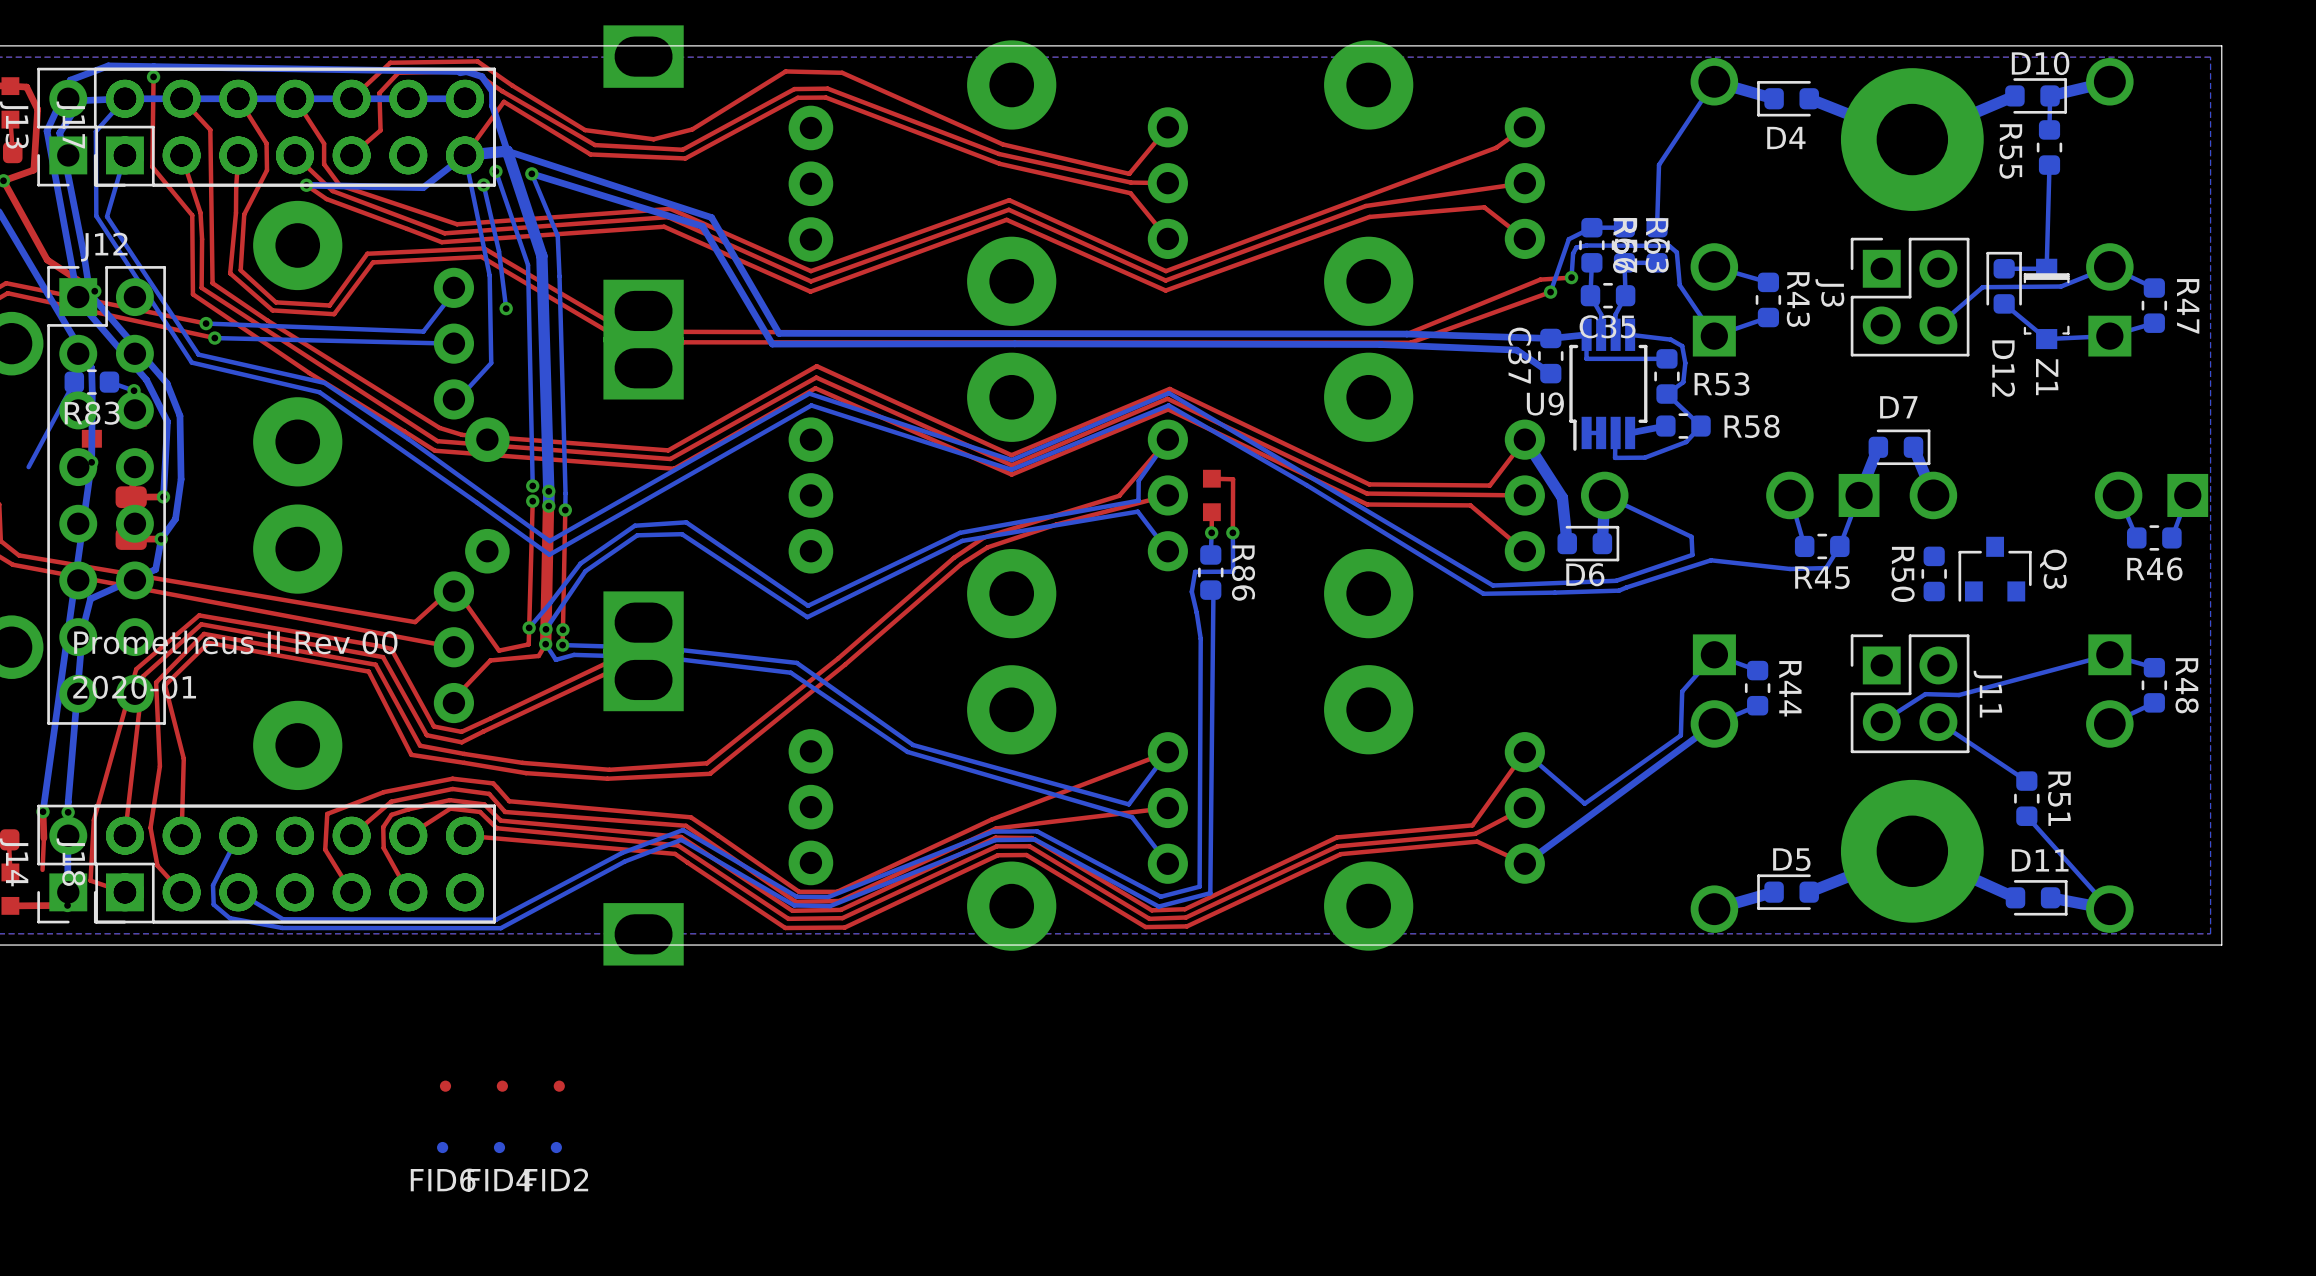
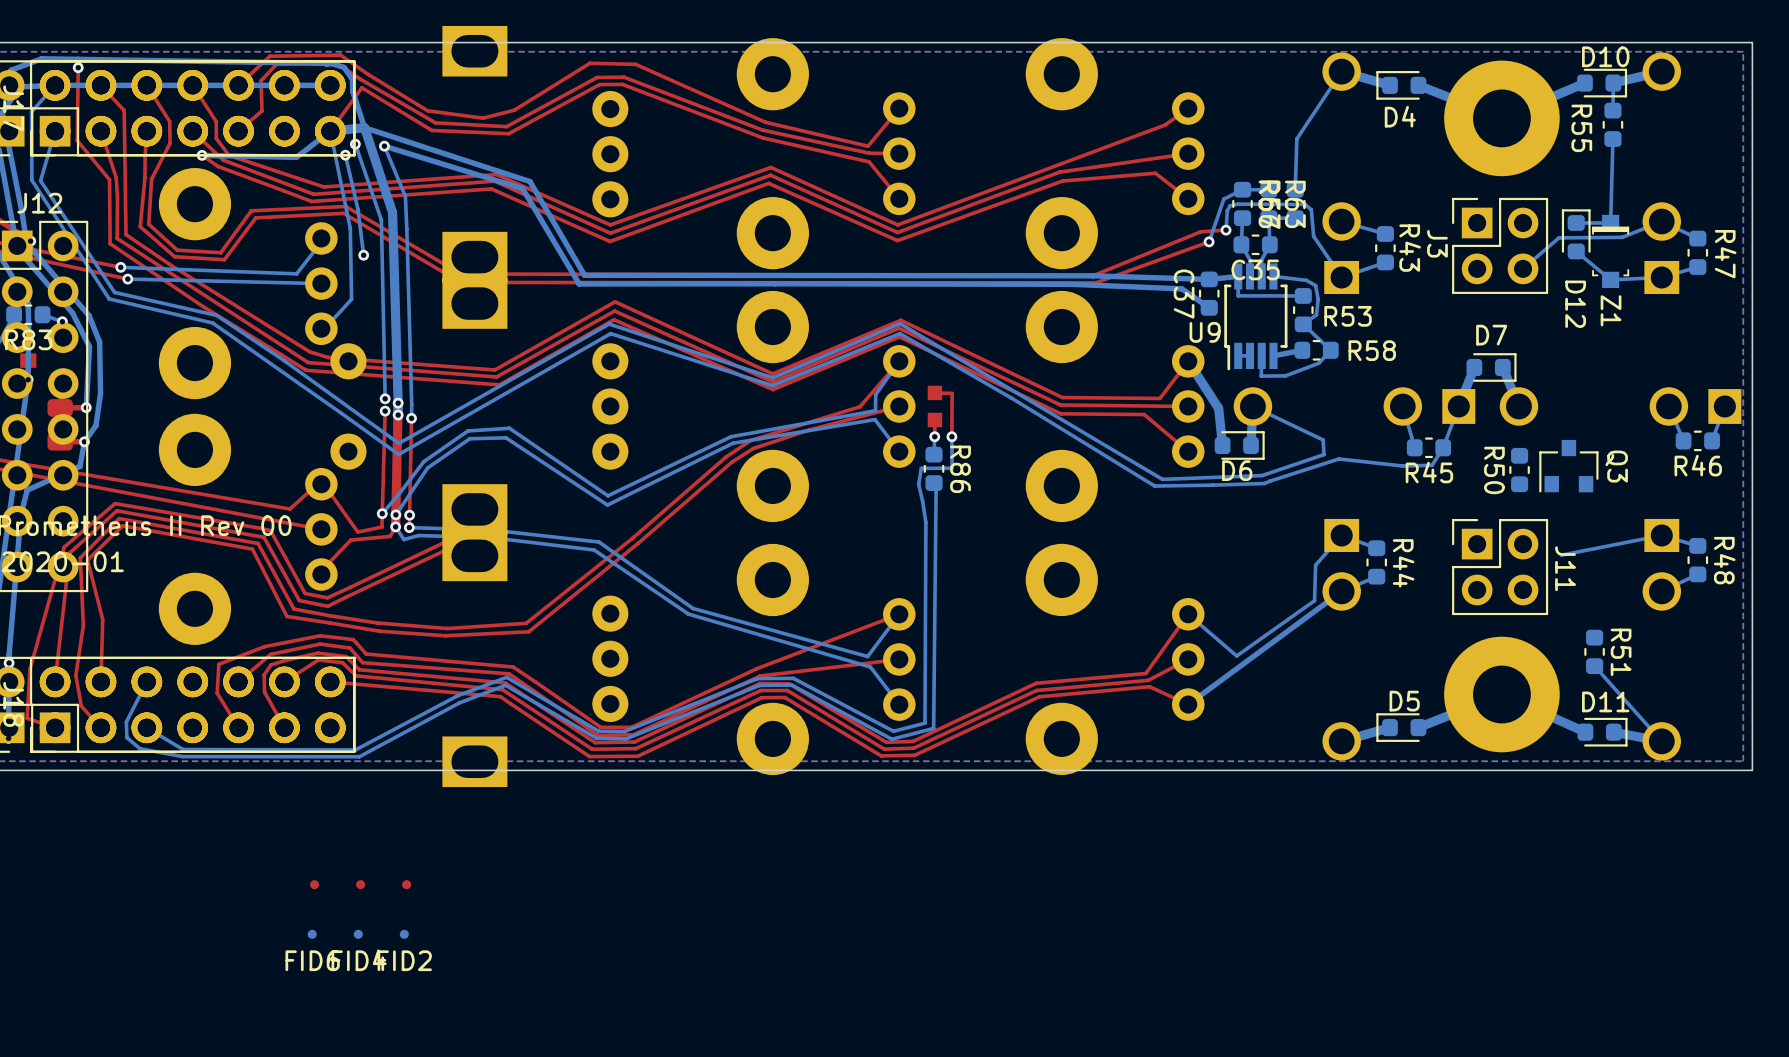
bottom track: (2109, 654) (1959, 695) (1925, 694) (1881, 722) -> (1661, 535) (1561, 555)
bottom track: (1938, 722) (2026, 781) -> none

